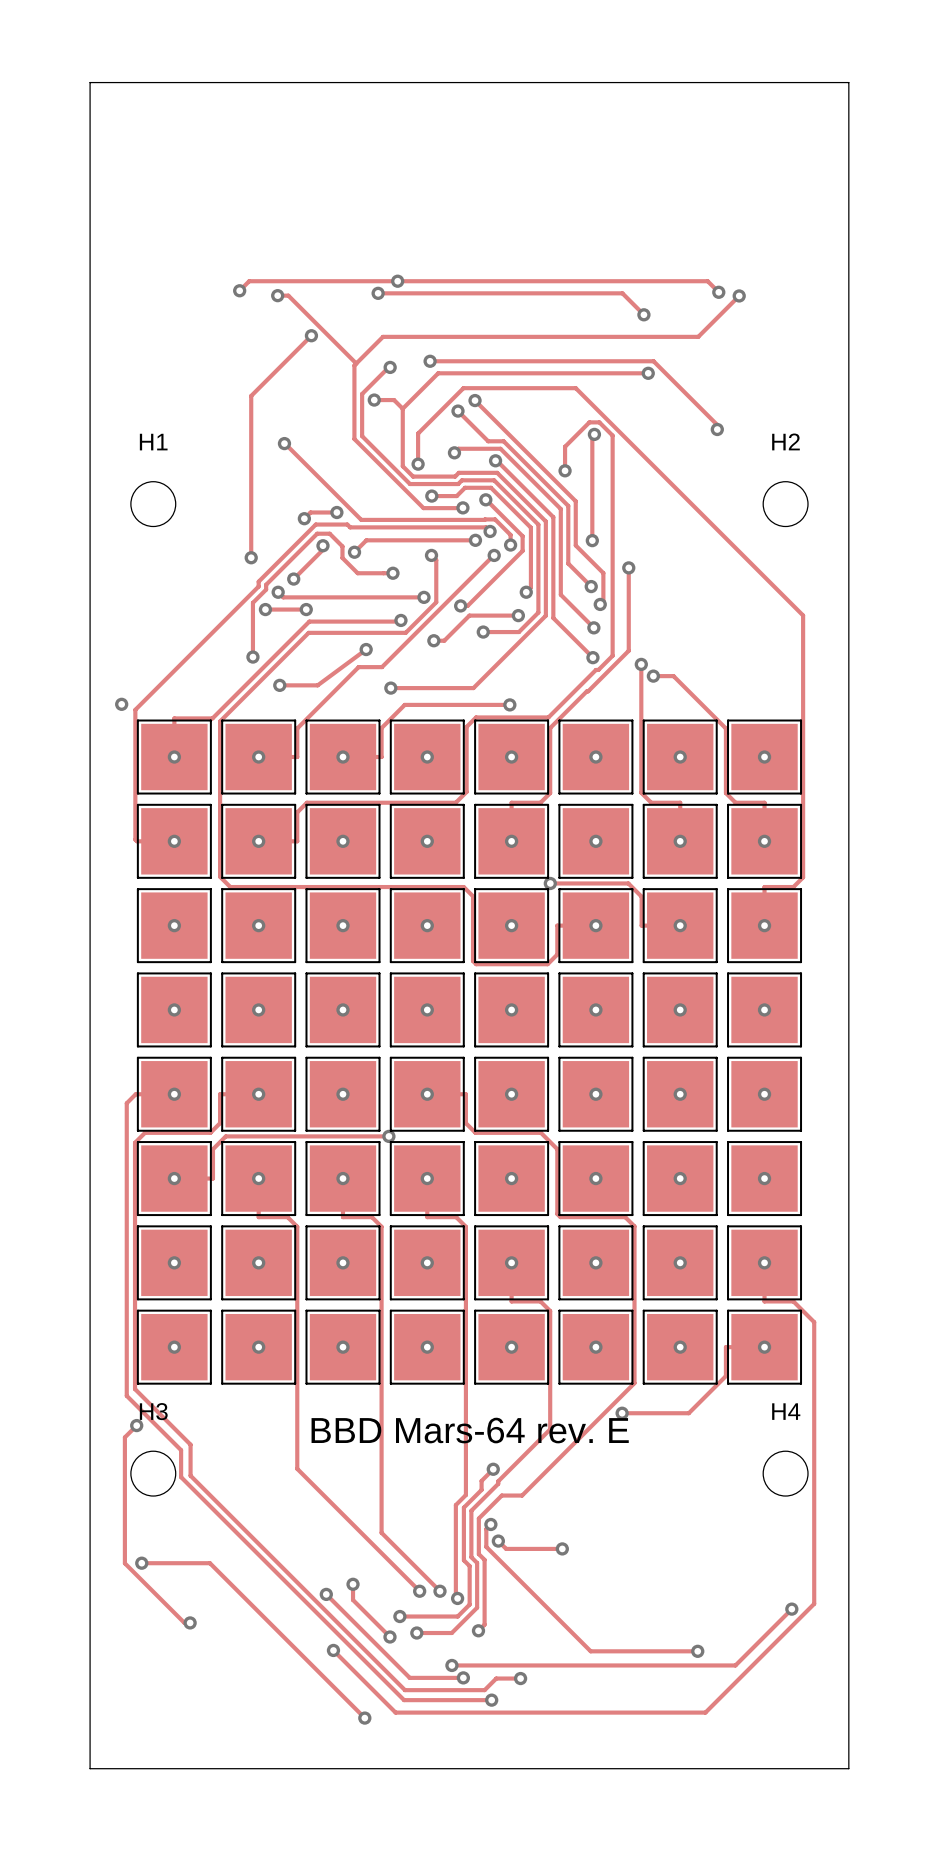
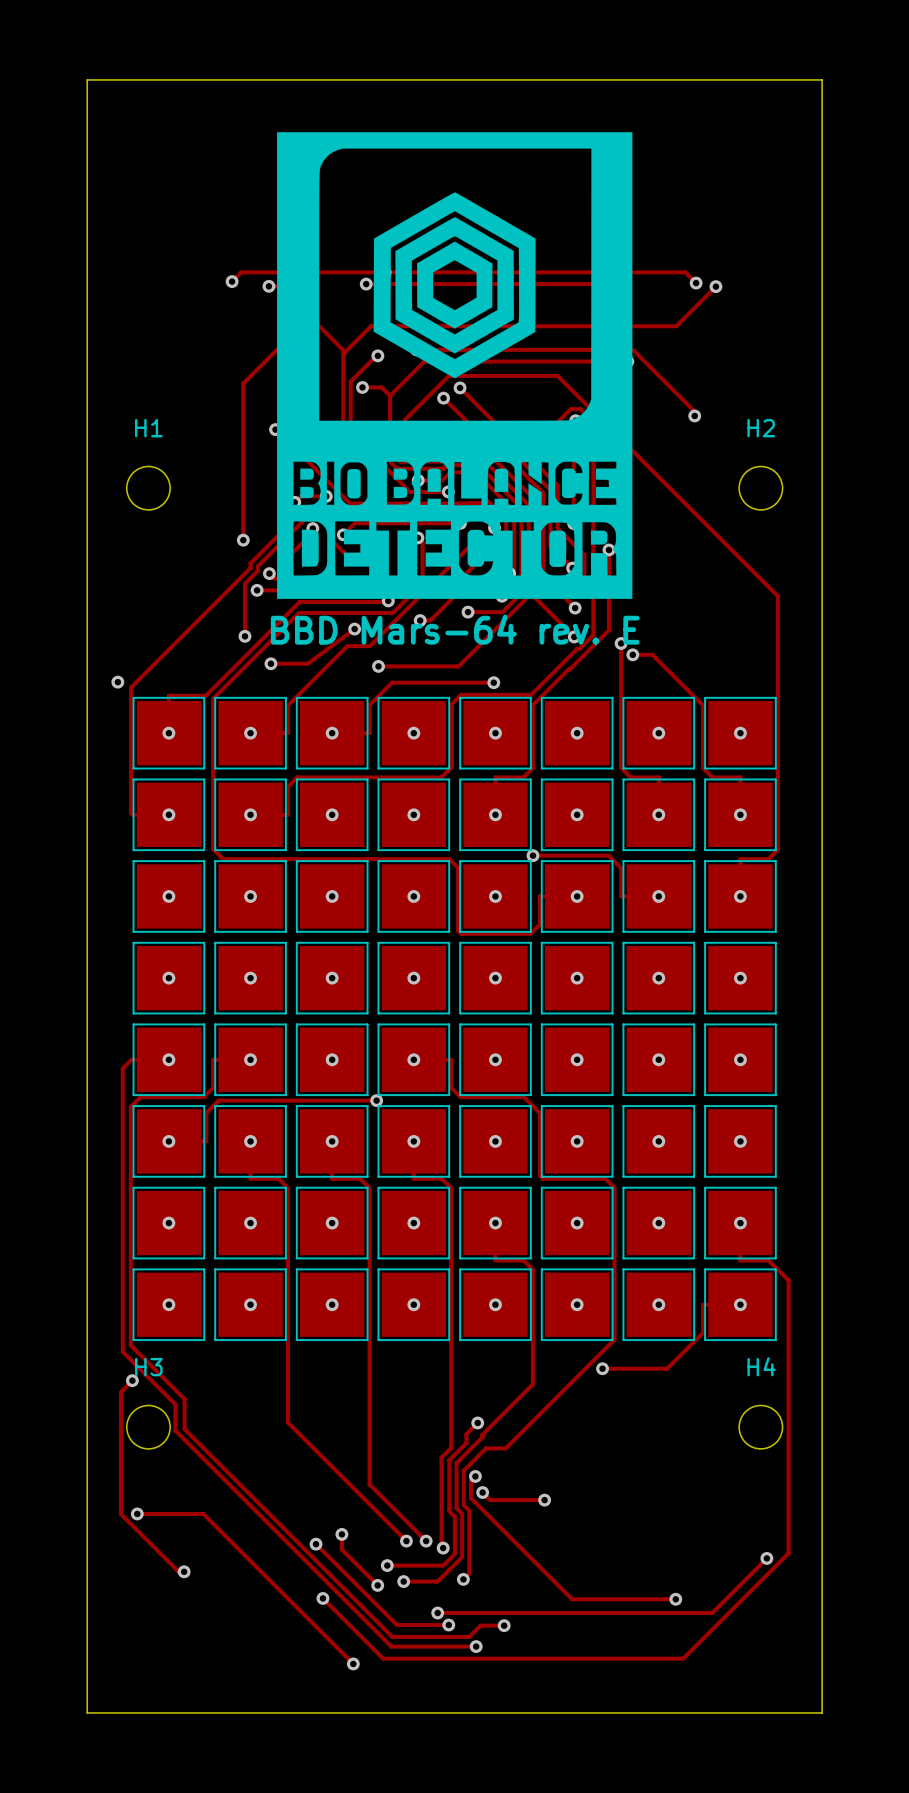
drawing: none -> [276, 132, 633, 599]
text: none -> BBD Mars-64 rev. E (455, 629)
text: BBD Mars-64 rev. E (470, 1430) -> none

